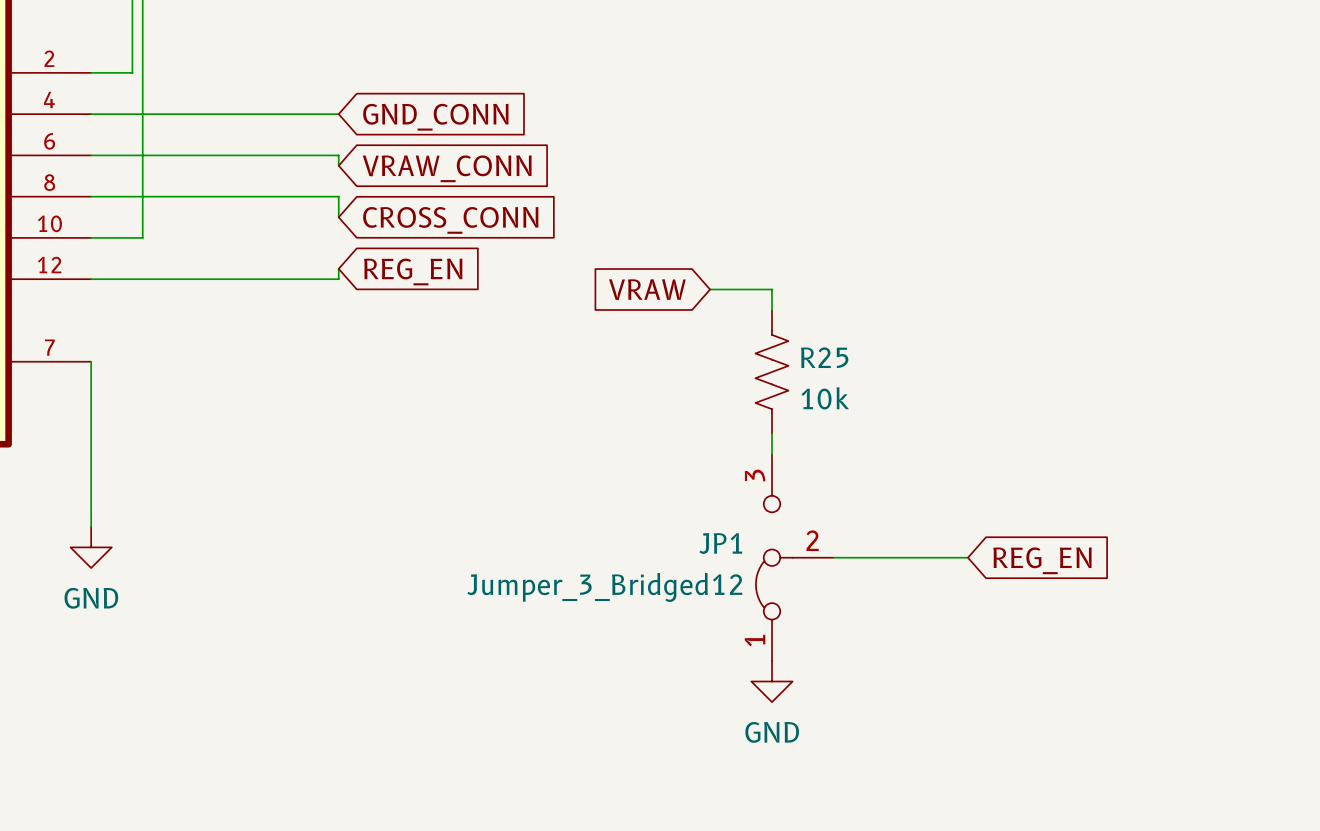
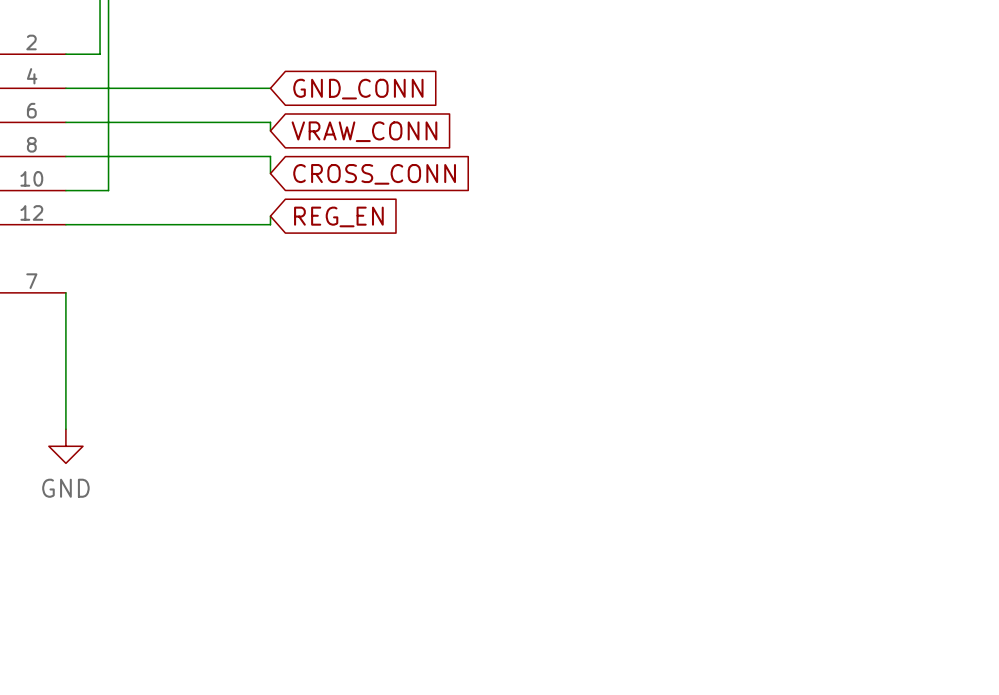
global label: VRAW (647, 289) -> none
wire: (710, 289) (771, 289) (771, 310) -> none
R25: 10k (771, 372) -> none
wire: (771, 433) (771, 454) -> none
JP1: Jumper_3_Bridged12 (794, 557) -> none
wire: (833, 557) (967, 557) -> none
global label: REG_EN (1042, 560) -> none
power symbol: GND (771, 681) -> none

